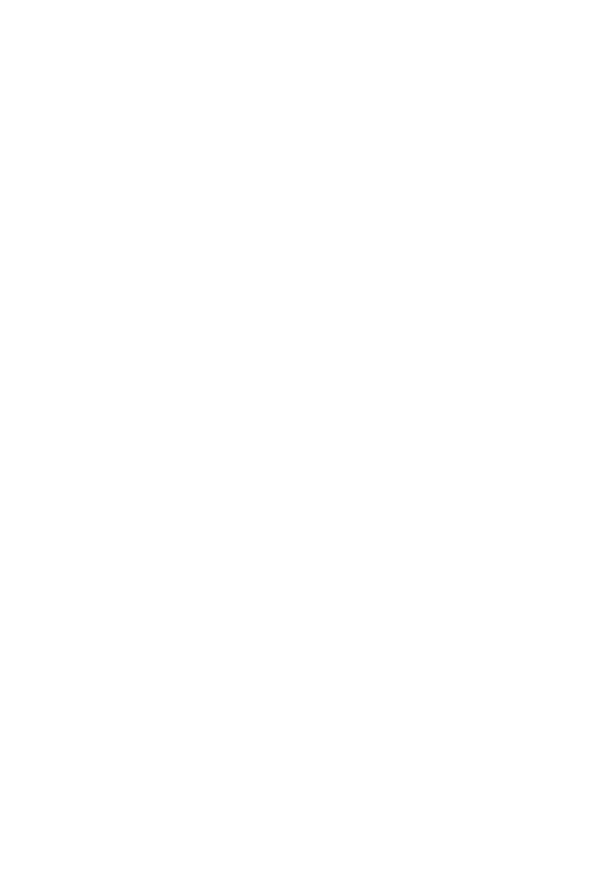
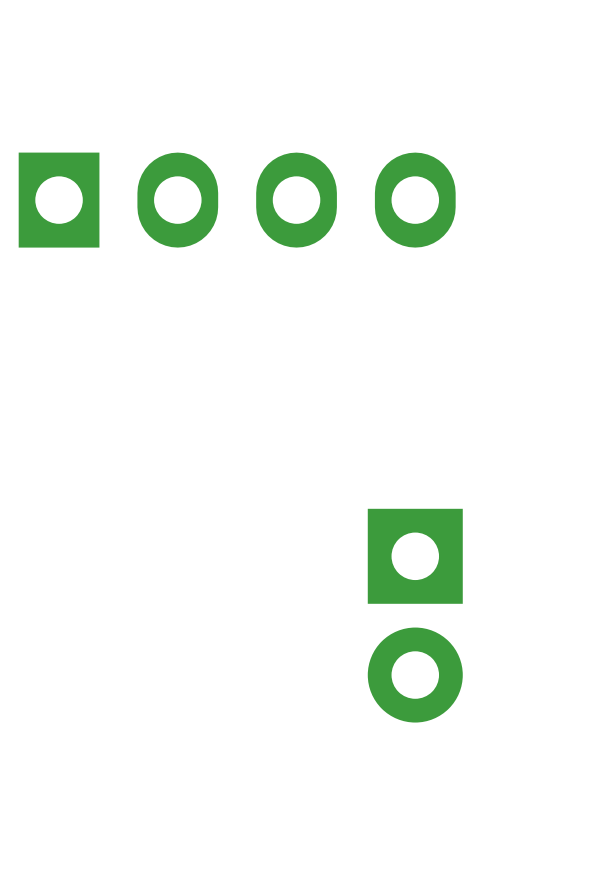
part: none -> (237, 200)
part: none -> (415, 615)

